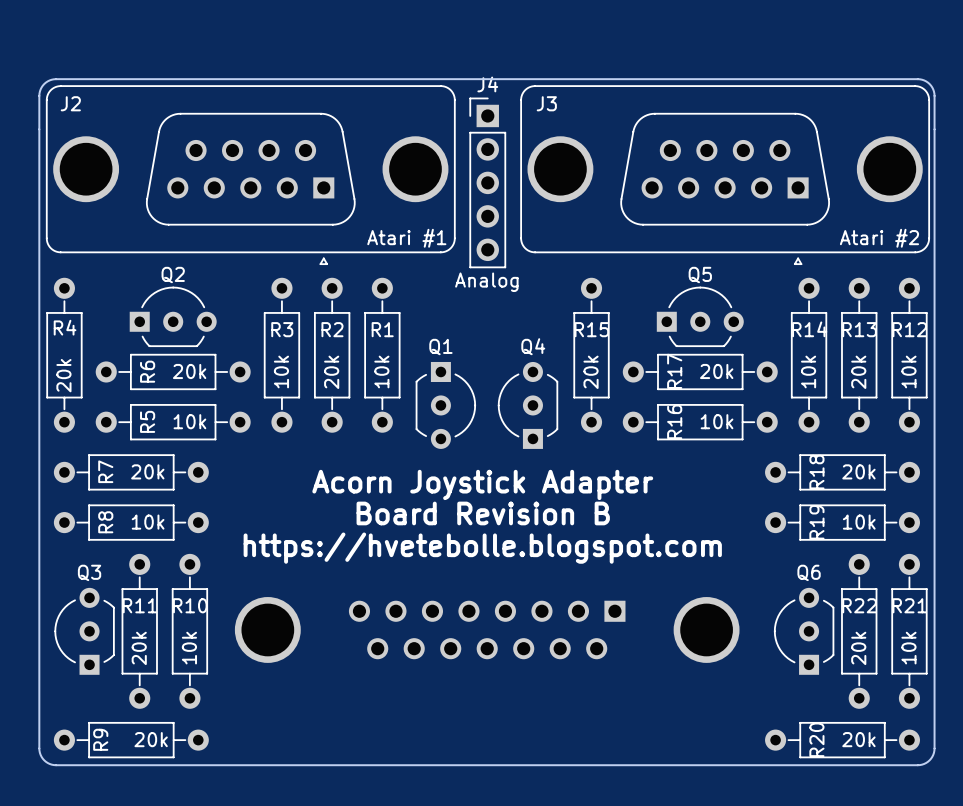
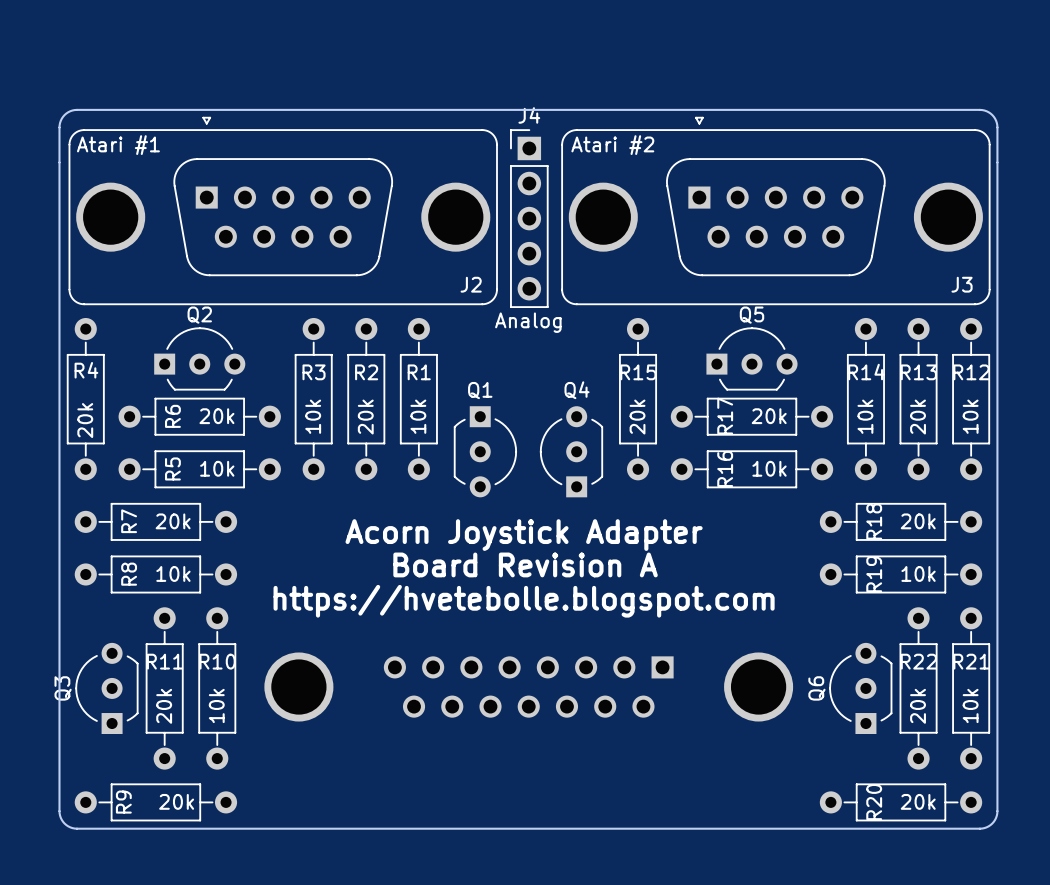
J2 rotation: 0° (250, 175) -> 180° (283, 210)
J3 rotation: 0° (725, 175) -> 180° (775, 210)
text: Board Revision B (483, 513) -> Board Revision A (525, 564)
Q3 name rotation: 0° (89, 572) -> 90° counterclockwise (63, 688)
Q3 name position: Q3 (89, 572) -> Q3 (63, 688)
Q6 name rotation: 0° (809, 572) -> 90° counterclockwise (816, 688)
Q6 name position: Q6 (809, 572) -> Q6 (816, 688)

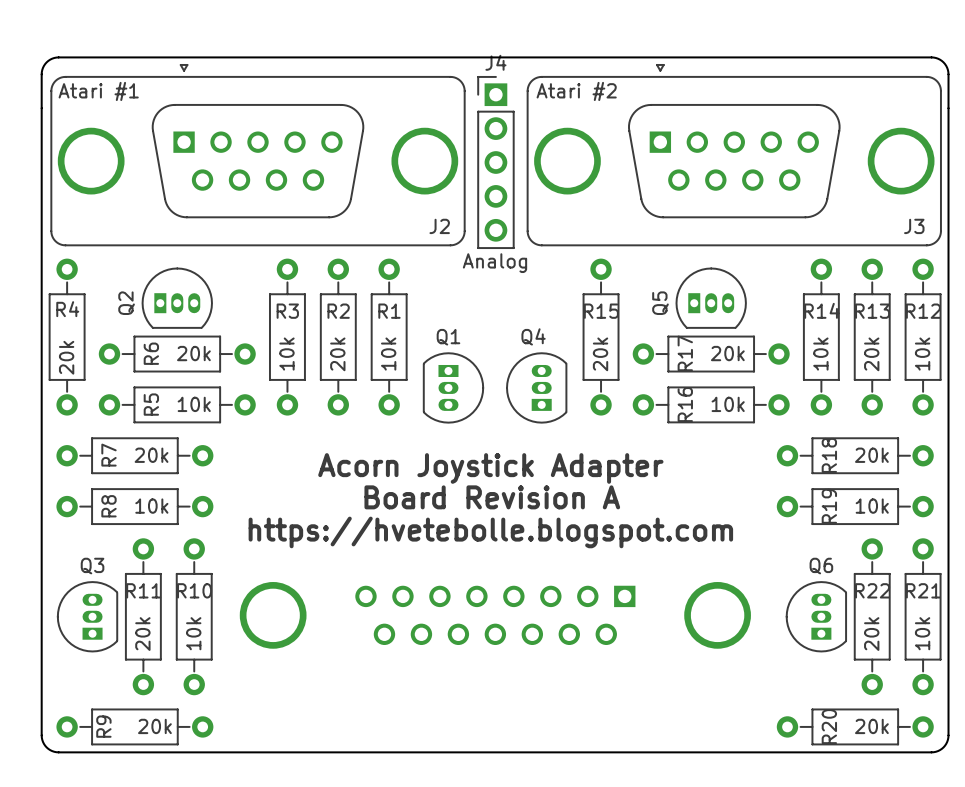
Q2 name position: Q2 (199, 315) -> Q2 (126, 303)
Q5 name position: Q5 (751, 315) -> Q5 (660, 303)
Q2 footprint: [154, 327, 246, 391] -> [141, 267, 213, 329]
Q5 footprint: [706, 327, 798, 391] -> [675, 267, 747, 329]
Q1 footprint: [453, 406, 517, 498] -> [422, 352, 484, 424]
Q4 footprint: [539, 406, 604, 498] -> [506, 352, 568, 424]
Q3 footprint: [75, 642, 139, 735] -> [57, 581, 119, 653]
Q6 footprint: [829, 642, 893, 735] -> [785, 581, 847, 653]
Q3 name position: Q3 (63, 688) -> Q3 (92, 566)
Q6 name position: Q6 (816, 688) -> Q6 (821, 566)

